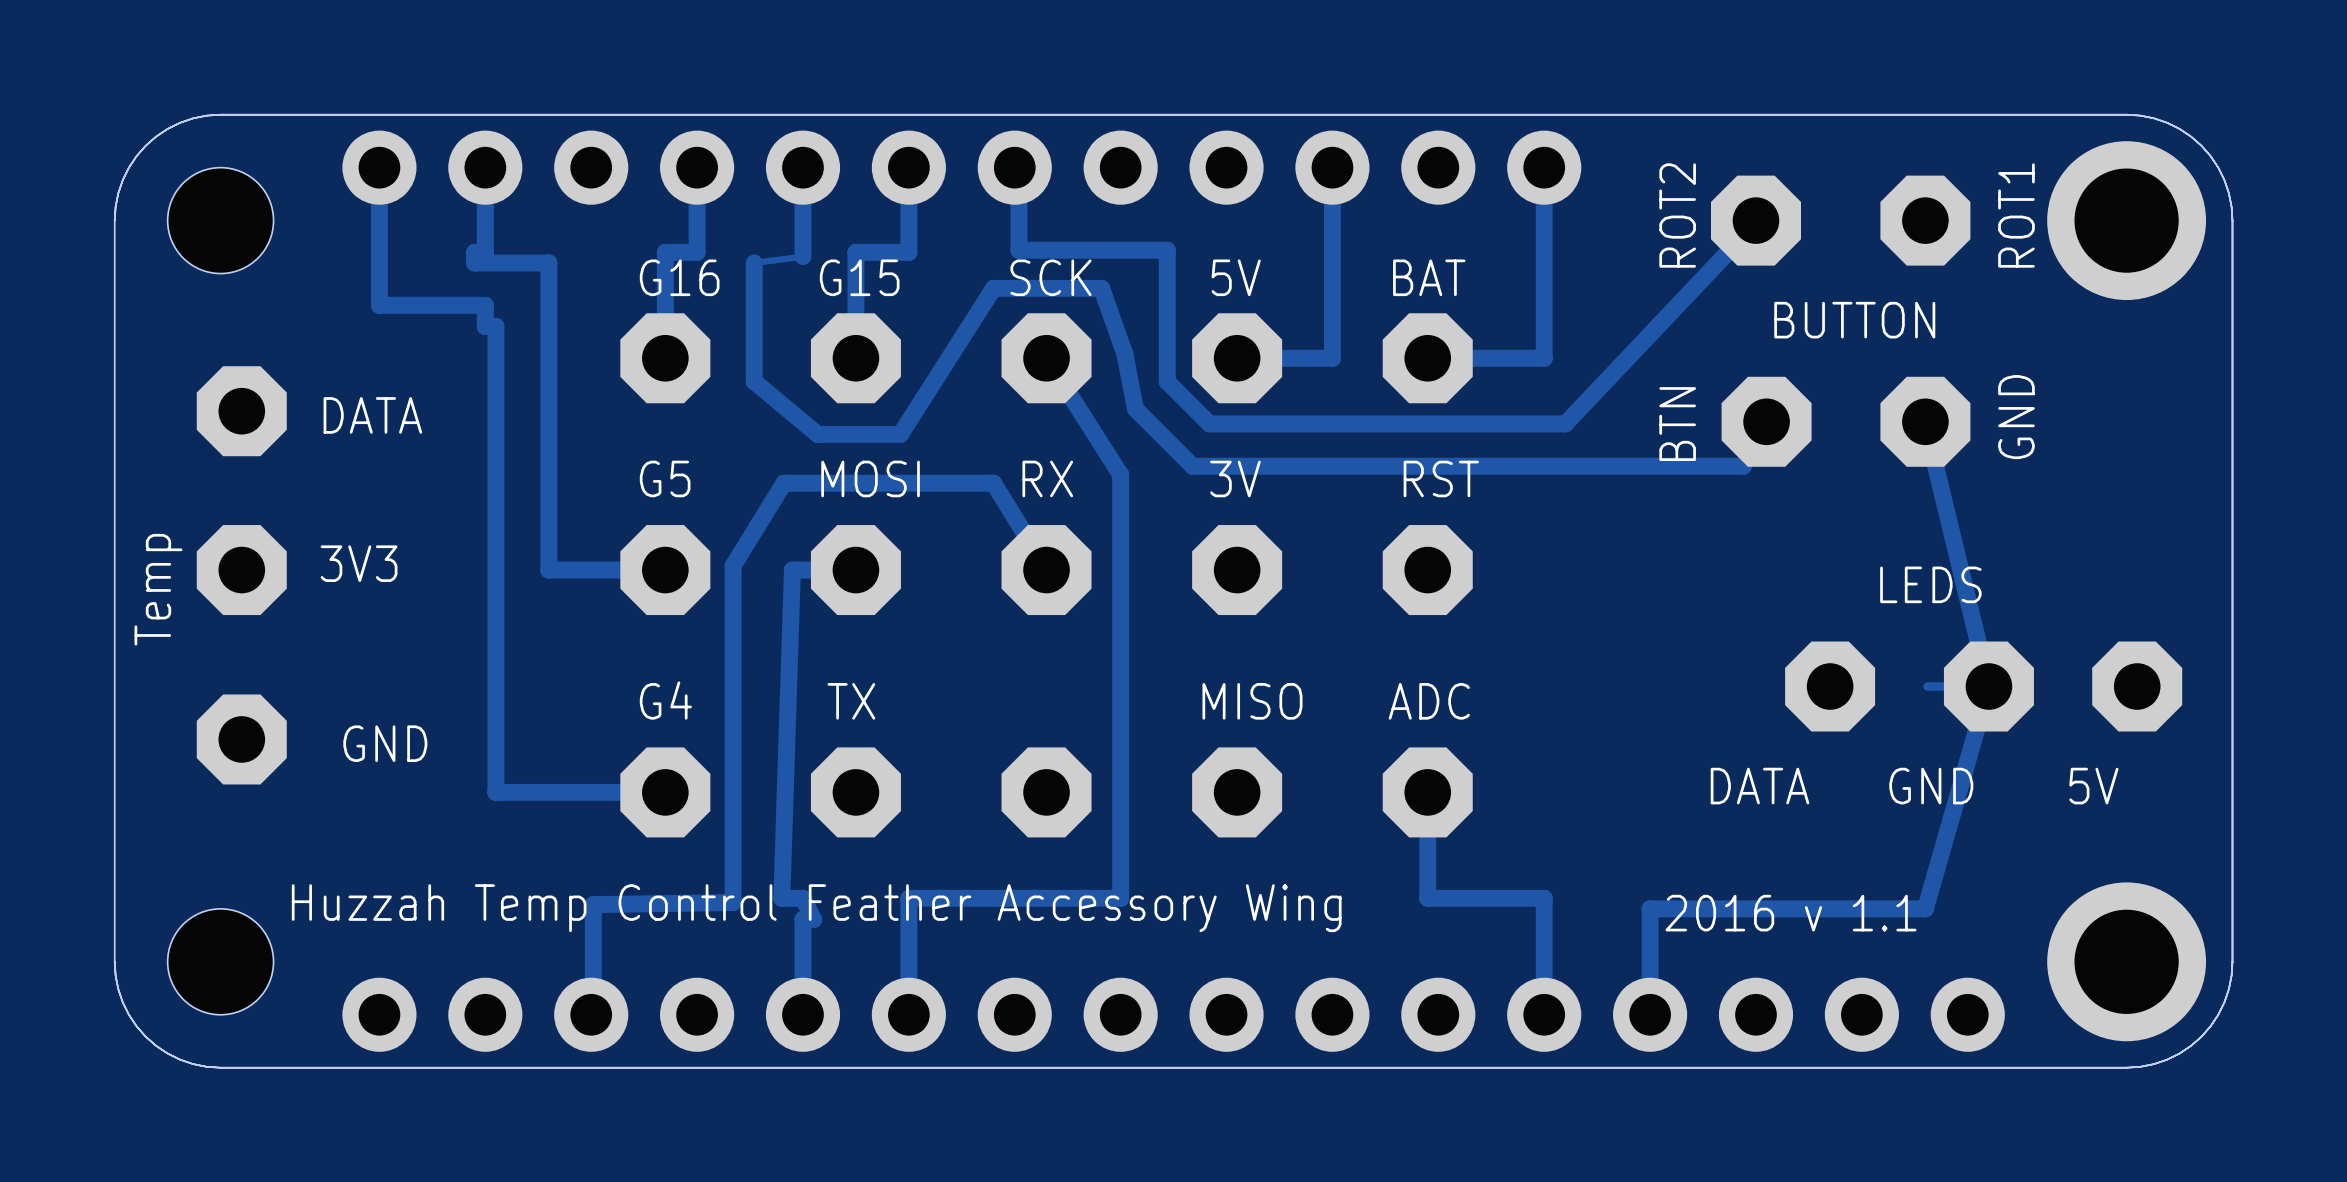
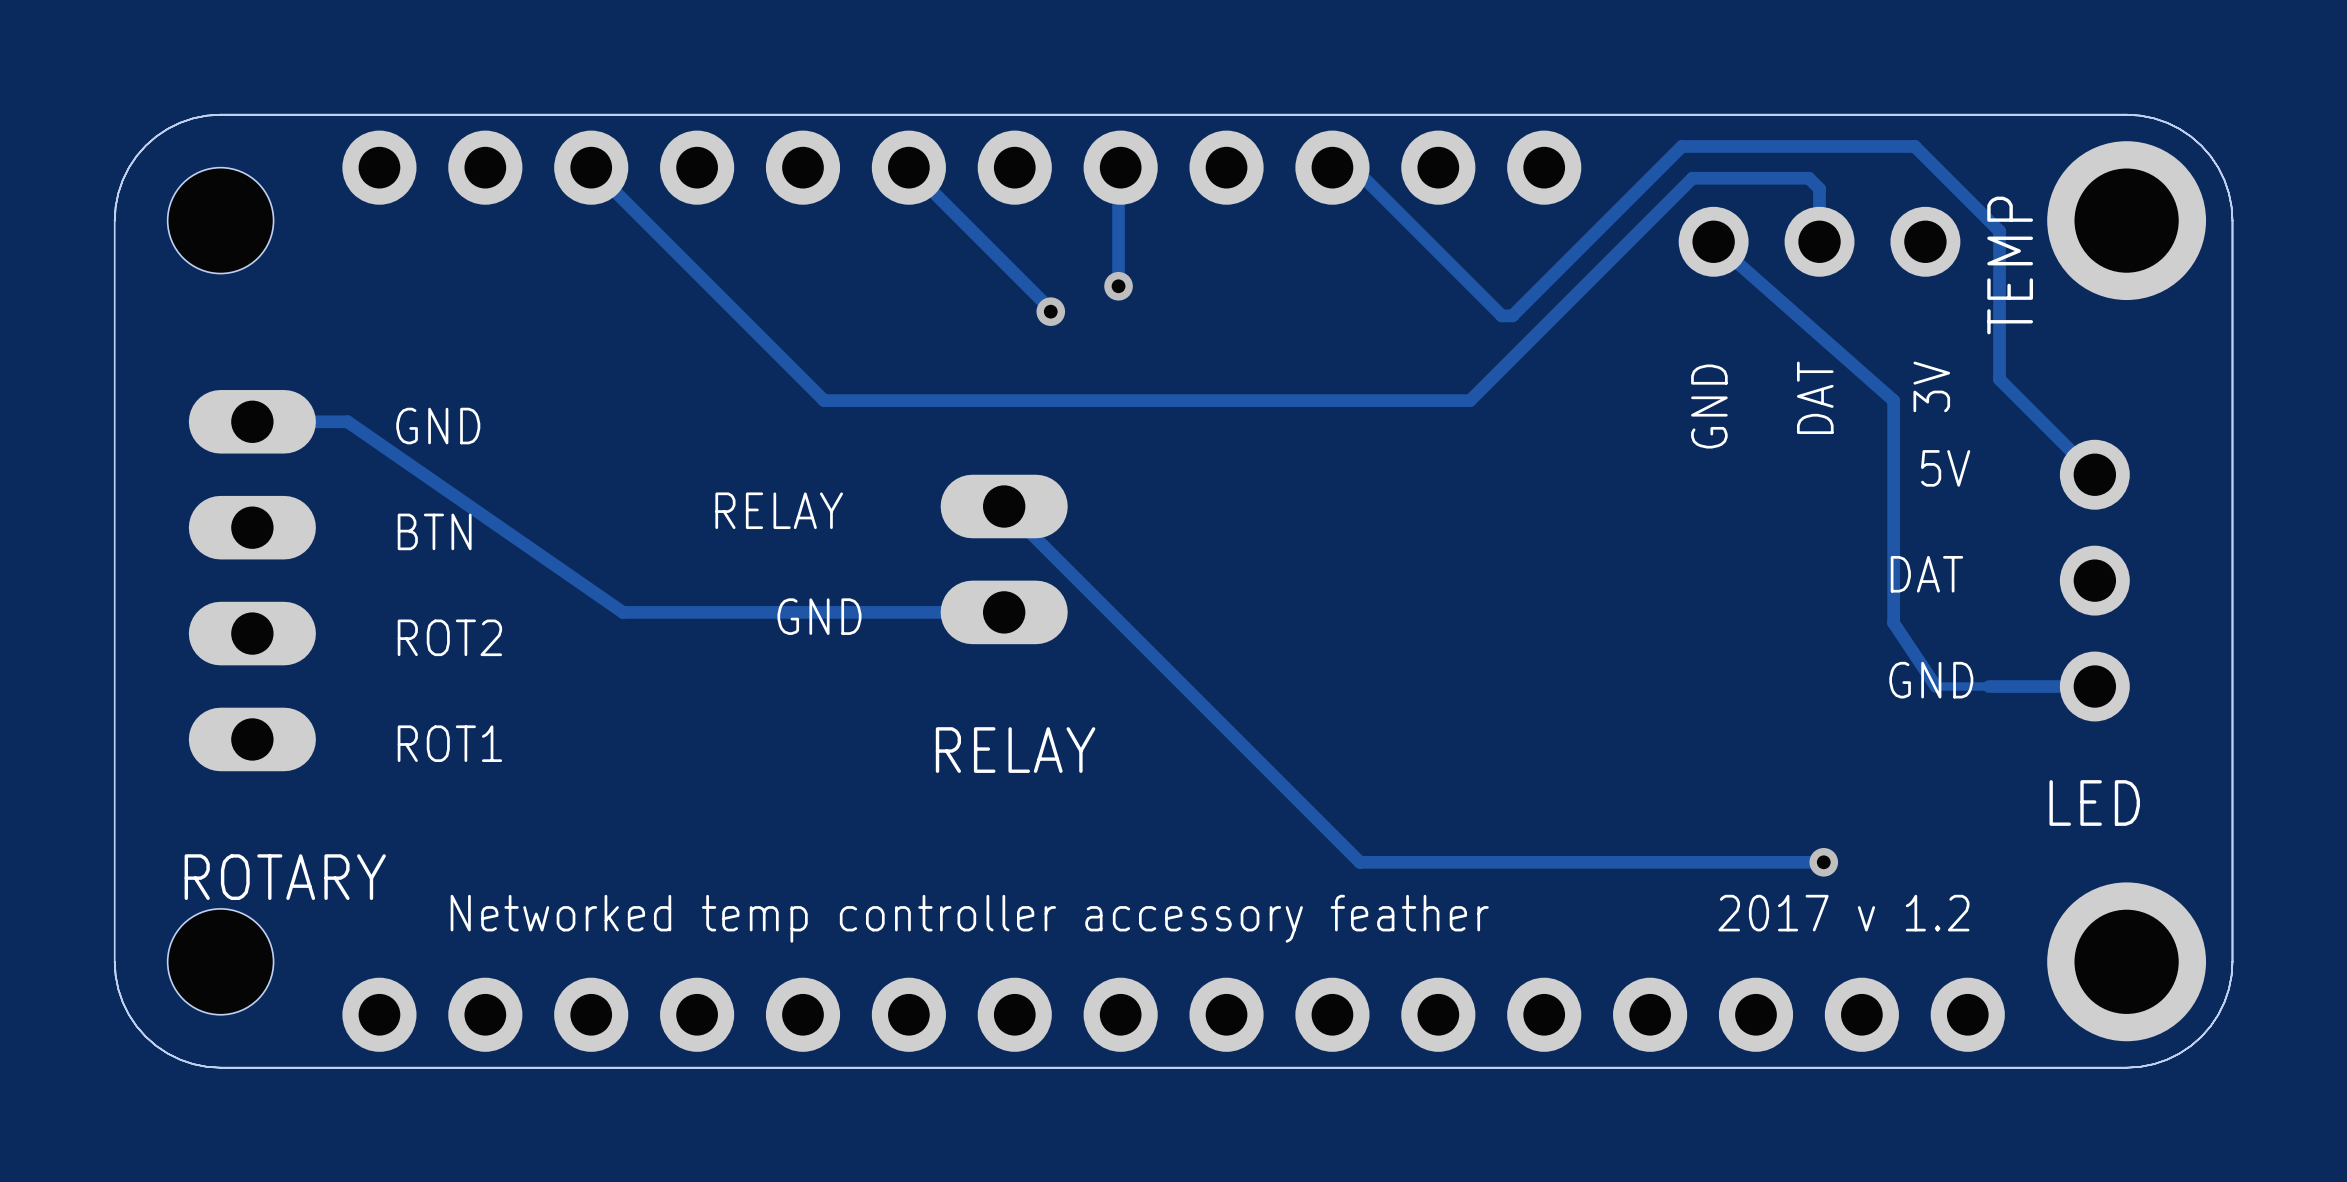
track: (379, 167) (379, 305) (485, 305) (485, 326) (495, 326) (495, 792) (665, 792) -> none
track: (485, 167) (485, 252) (474, 252) (474, 262) (548, 262) (548, 570) (665, 570) -> none
track: none -> (591, 167) (824, 400) (1470, 400) (1692, 178) (1808, 178) (1819, 188) (1819, 241)
track: (697, 167) (697, 252) (665, 252) (665, 358) -> none
track: (802, 167) (802, 256) (754, 262) (754, 381) (817, 434) (900, 434) (993, 288) (1101, 288) (1124, 354) (1135, 409) (1192, 466) (1743, 466) (1766, 421) -> none
track: (908, 167) (908, 252) (855, 252) (855, 368) -> none
track: (1014, 167) (1019, 171) (1019, 250) (1167, 250) (1167, 381) (1209, 423) (1565, 423) (1755, 220) -> none
track: (1332, 167) (1332, 358) (1237, 358) -> (1332, 167) (1353, 167) (1501, 315) (1512, 315) (1681, 146) (1914, 146) (1999, 231) (1999, 379) (2094, 474)
track: (1544, 167) (1544, 358) (1427, 358) -> none
track: none -> (911, 171) (908, 167) (1050, 311)
track: none -> (1120, 171) (1120, 167) (1118, 169) (1118, 286)
text: ROT2 (1677, 215) -> none
text: ROT1 (2016, 215) -> TEMP (2010, 265)
part: (1755, 220) -> none
part: (1925, 220) -> none
part: none -> (1819, 241)
text: G16 (679, 277) -> none
text: G15 (859, 277) -> none
text: SCK (1050, 277) -> none
text: 5V (1236, 277) -> none
text: BAT (1429, 277) -> none
via: none -> (1118, 286)
via: none -> (1050, 311)
text: BUTTON (1854, 320) -> DAT (1815, 397)
part: (665, 358) -> none
part: (855, 358) -> none
track: (1046, 358) (1120, 474) (1120, 898) (908, 898) (908, 1014) -> none
part: (1046, 358) -> none
part: (1237, 358) -> none
part: (1427, 358) -> none
part: (241, 411) -> none
text: DATA (372, 415) -> none
text: GND (2016, 417) -> none
track: none -> (252, 421) (347, 421) (622, 612) (1004, 612)
part: (1766, 421) -> none
track: (1925, 421) (1927, 423) (1925, 423) (1988, 686) (1925, 908) (1650, 908) (1650, 1014) -> none
part: (1925, 421) -> none
text: BTN (1677, 424) -> GND (1709, 406)
text: none -> GND (438, 426)
text: G5 (665, 478) -> none
text: MOSI (870, 478) -> none
text: RX (1047, 478) -> none
text rotation: 0° (1235, 478) -> 90° counterclockwise (1931, 386)
text position: 3V (1235, 478) -> 3V (1931, 386)
text: RST (1441, 478) -> none
track: none -> (1004, 506) (1359, 862) (1823, 862)
text: none -> RELAY (779, 510)
part footprint: [196, 525, 287, 616] -> [188, 390, 316, 772]
text: none -> BTN (434, 531)
part: none -> (1004, 559)
text: 3V3 (359, 563) -> none
part: (665, 570) -> none
track: (855, 570) (792, 570) (781, 898) (802, 898) (813, 919) (802, 919) (802, 1014) -> none
part: (855, 570) -> none
track: (1046, 570) (993, 483) (783, 483) (733, 565) (733, 902) (593, 904) (593, 1010) (591, 1014) -> none
part: (1046, 570) -> none
part: (1237, 570) -> none
part: (1427, 570) -> none
part: none -> (2094, 580)
text: LEDS (1930, 584) -> DAT (1926, 574)
text: Temp (158, 589) -> none
text: none -> GND (819, 616)
text: none -> ROT2 (449, 637)
part: (1830, 686) -> none
track: (1936, 686) (1927, 686) -> (1936, 686) (1893, 622) (1893, 400) (1713, 241)
part: (1988, 686) -> none
track: none -> (2094, 686) (1988, 686)
part: (2137, 686) -> none
text: G4 (665, 700) -> none
text: TX (851, 701) -> none
text: MISO (1252, 701) -> none
text: ADC (1429, 701) -> none
part: (241, 739) -> none
text: GND (385, 743) -> none
text: none -> ROT1 (449, 743)
text: none -> RELAY (1015, 750)
text: DATA (1760, 786) -> none
text position: GND (1931, 786) -> GND (1931, 680)
text position: 5V (2093, 786) -> 5V (1945, 468)
part: (665, 792) -> none
part: (855, 792) -> none
part: (1046, 792) -> none
part: (1237, 792) -> none
track: (1427, 792) (1427, 898) (1544, 898) (1544, 1014) -> none
part: (1427, 792) -> none
text: none -> LED (2094, 802)
via: none -> (1823, 862)
text: none -> ROTARY (285, 877)
text: Huzzah Temp Control Feather Accessory Wing (816, 908) -> none
text: 2016 v 1.1 (1790, 913) -> 2017 v 1.2 (1843, 913)
text: none -> Networked temp controller accessory feather (969, 918)

